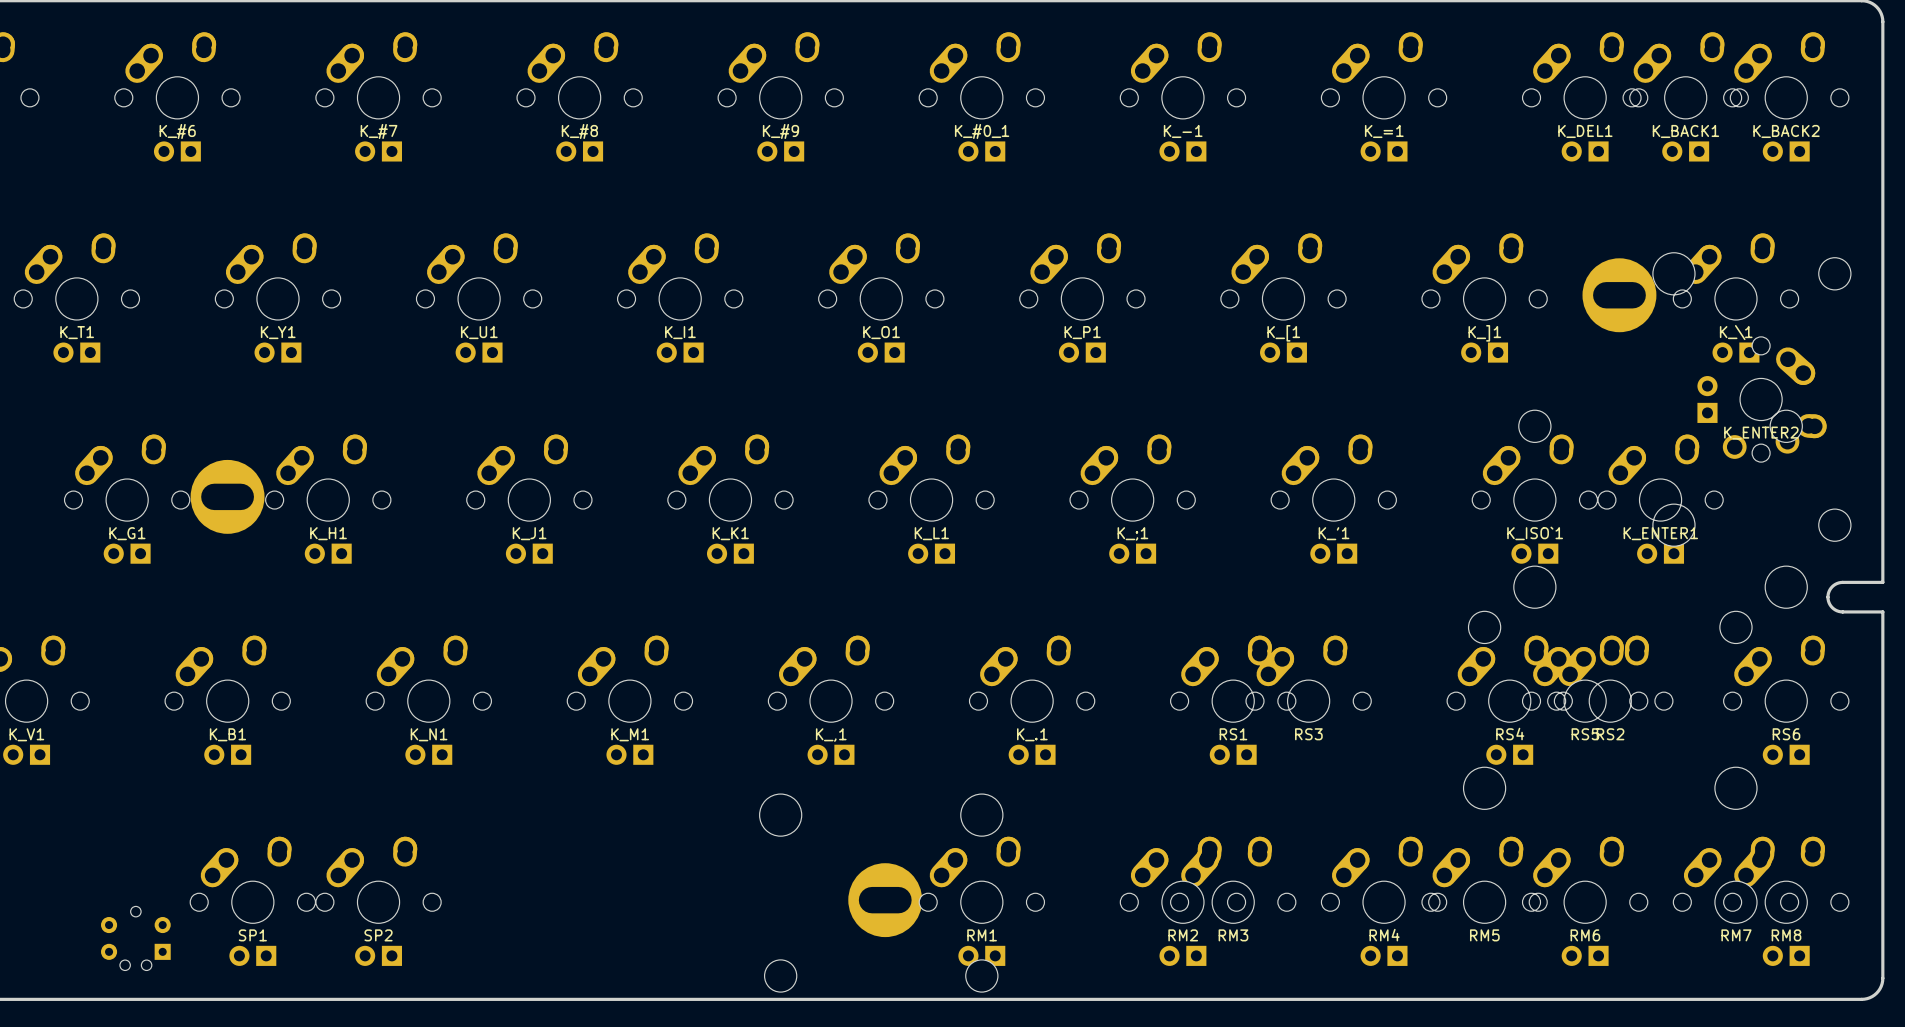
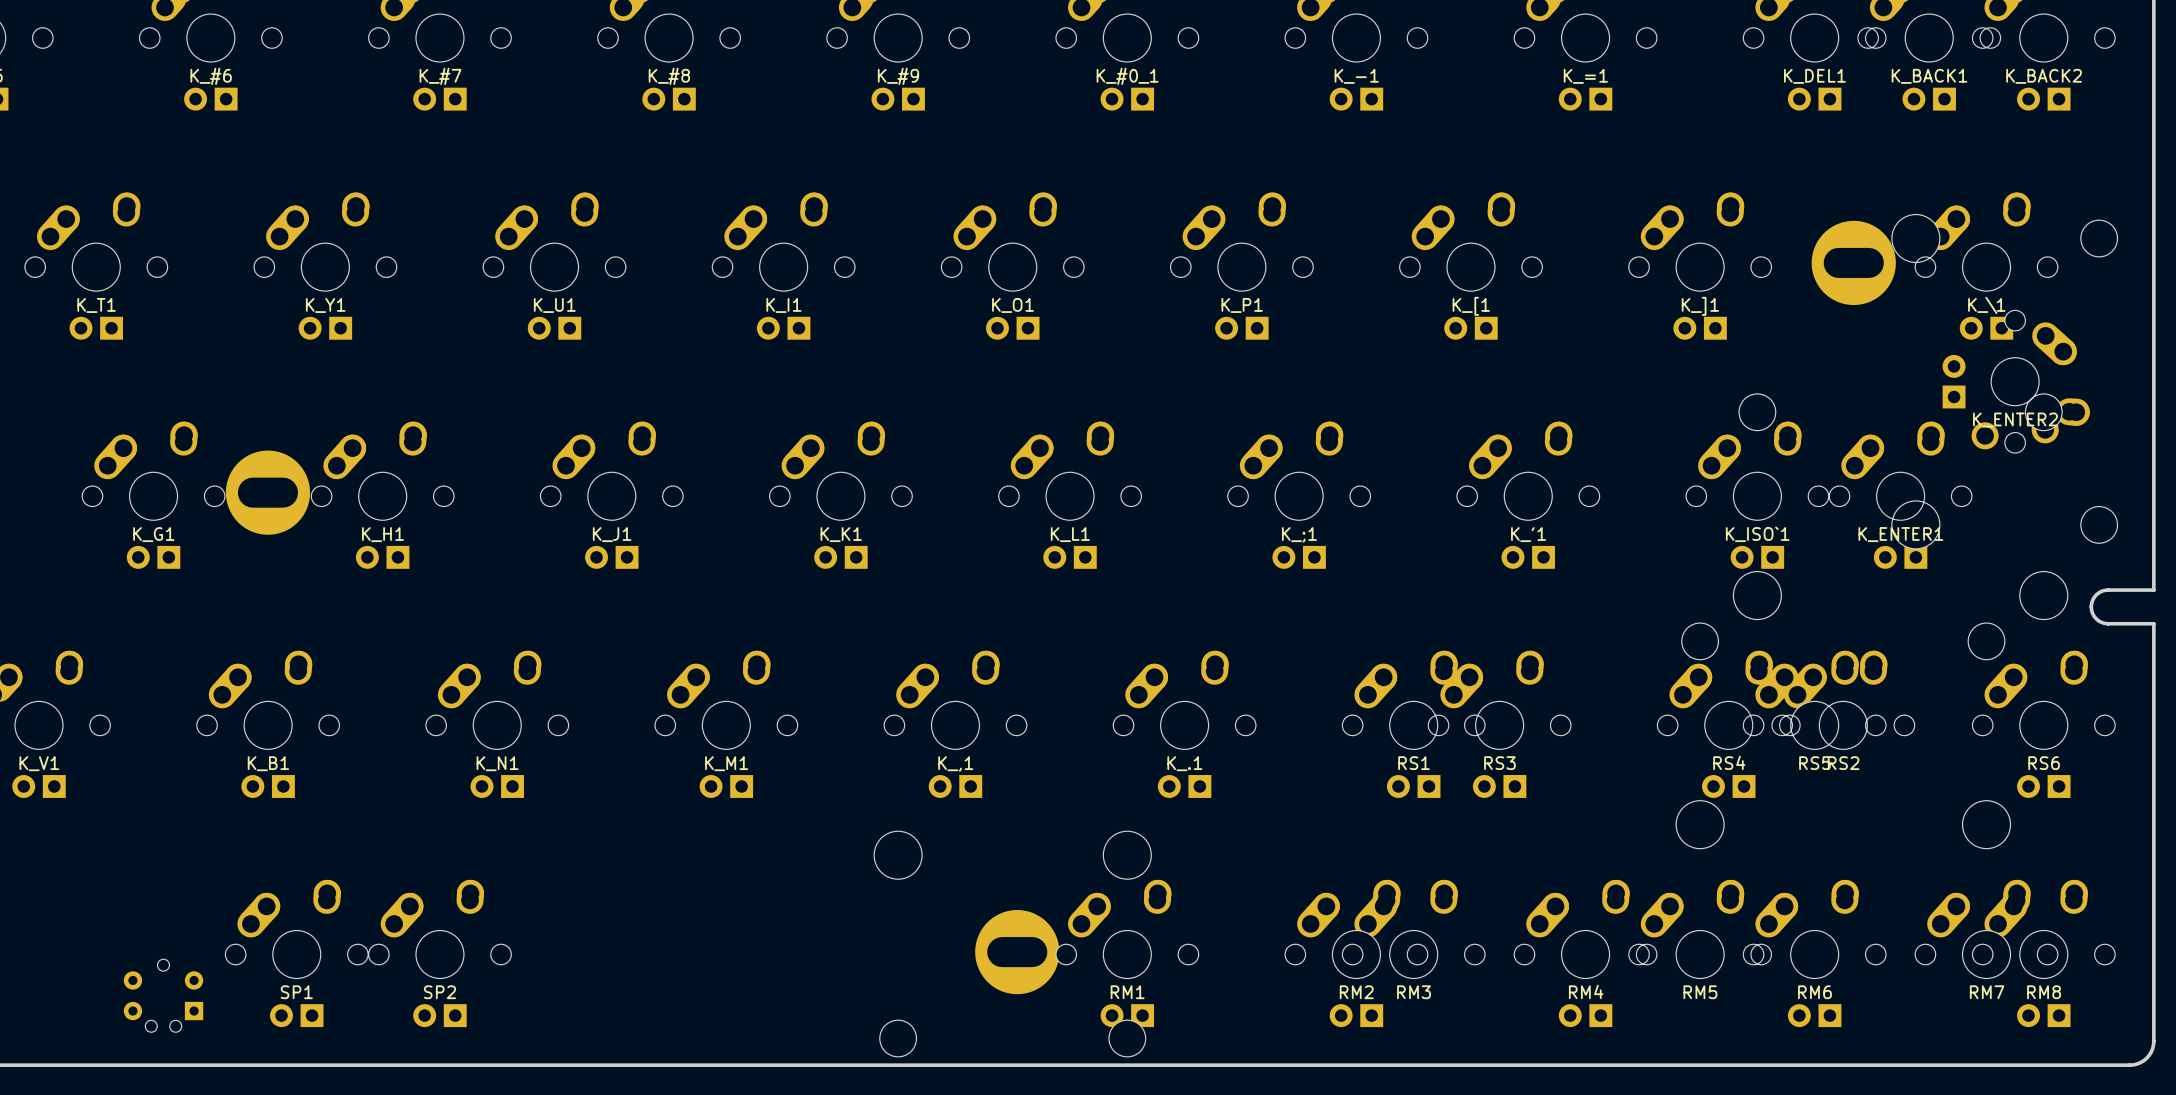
part: none -> (1499, 786)

